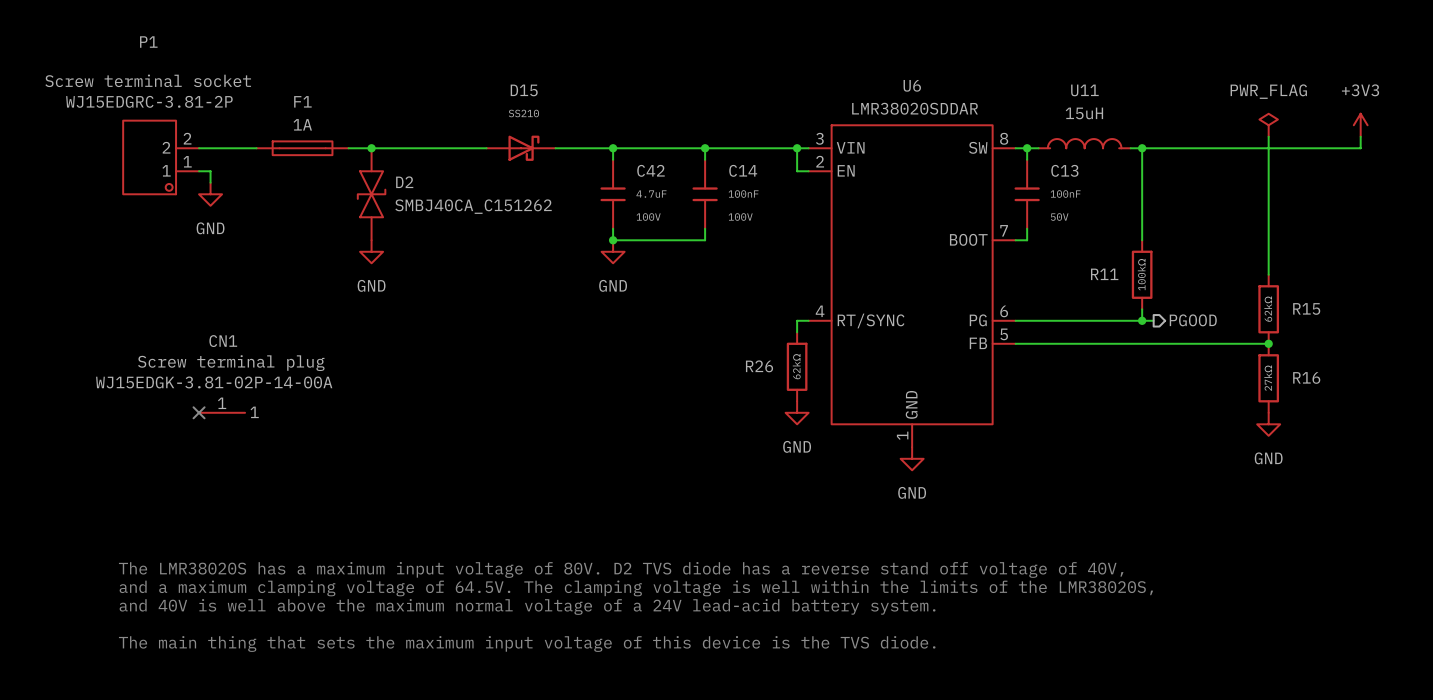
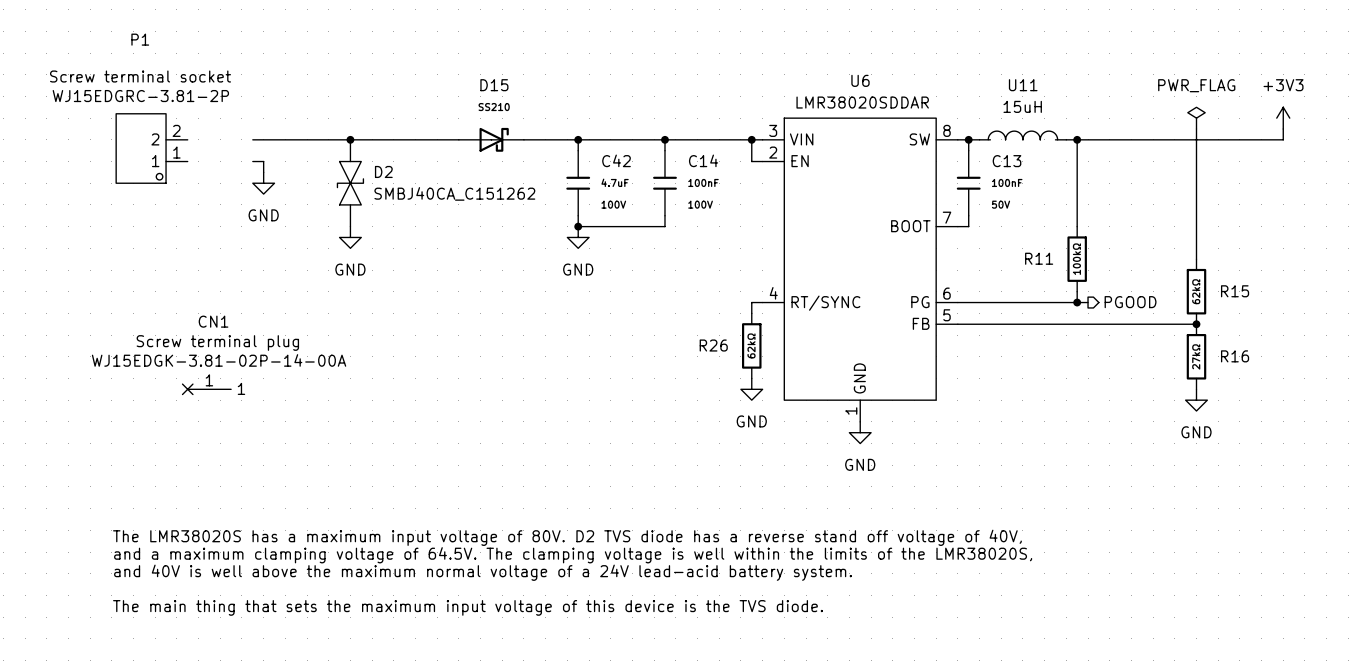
wire: (199, 148) (256, 148) -> none
F1: 1A (302, 148) -> none
wire: (199, 171) (210, 171) (210, 182) -> (252, 161) (263, 161) (263, 172)
power symbol position: GND (210, 194) -> GND (263, 183)

